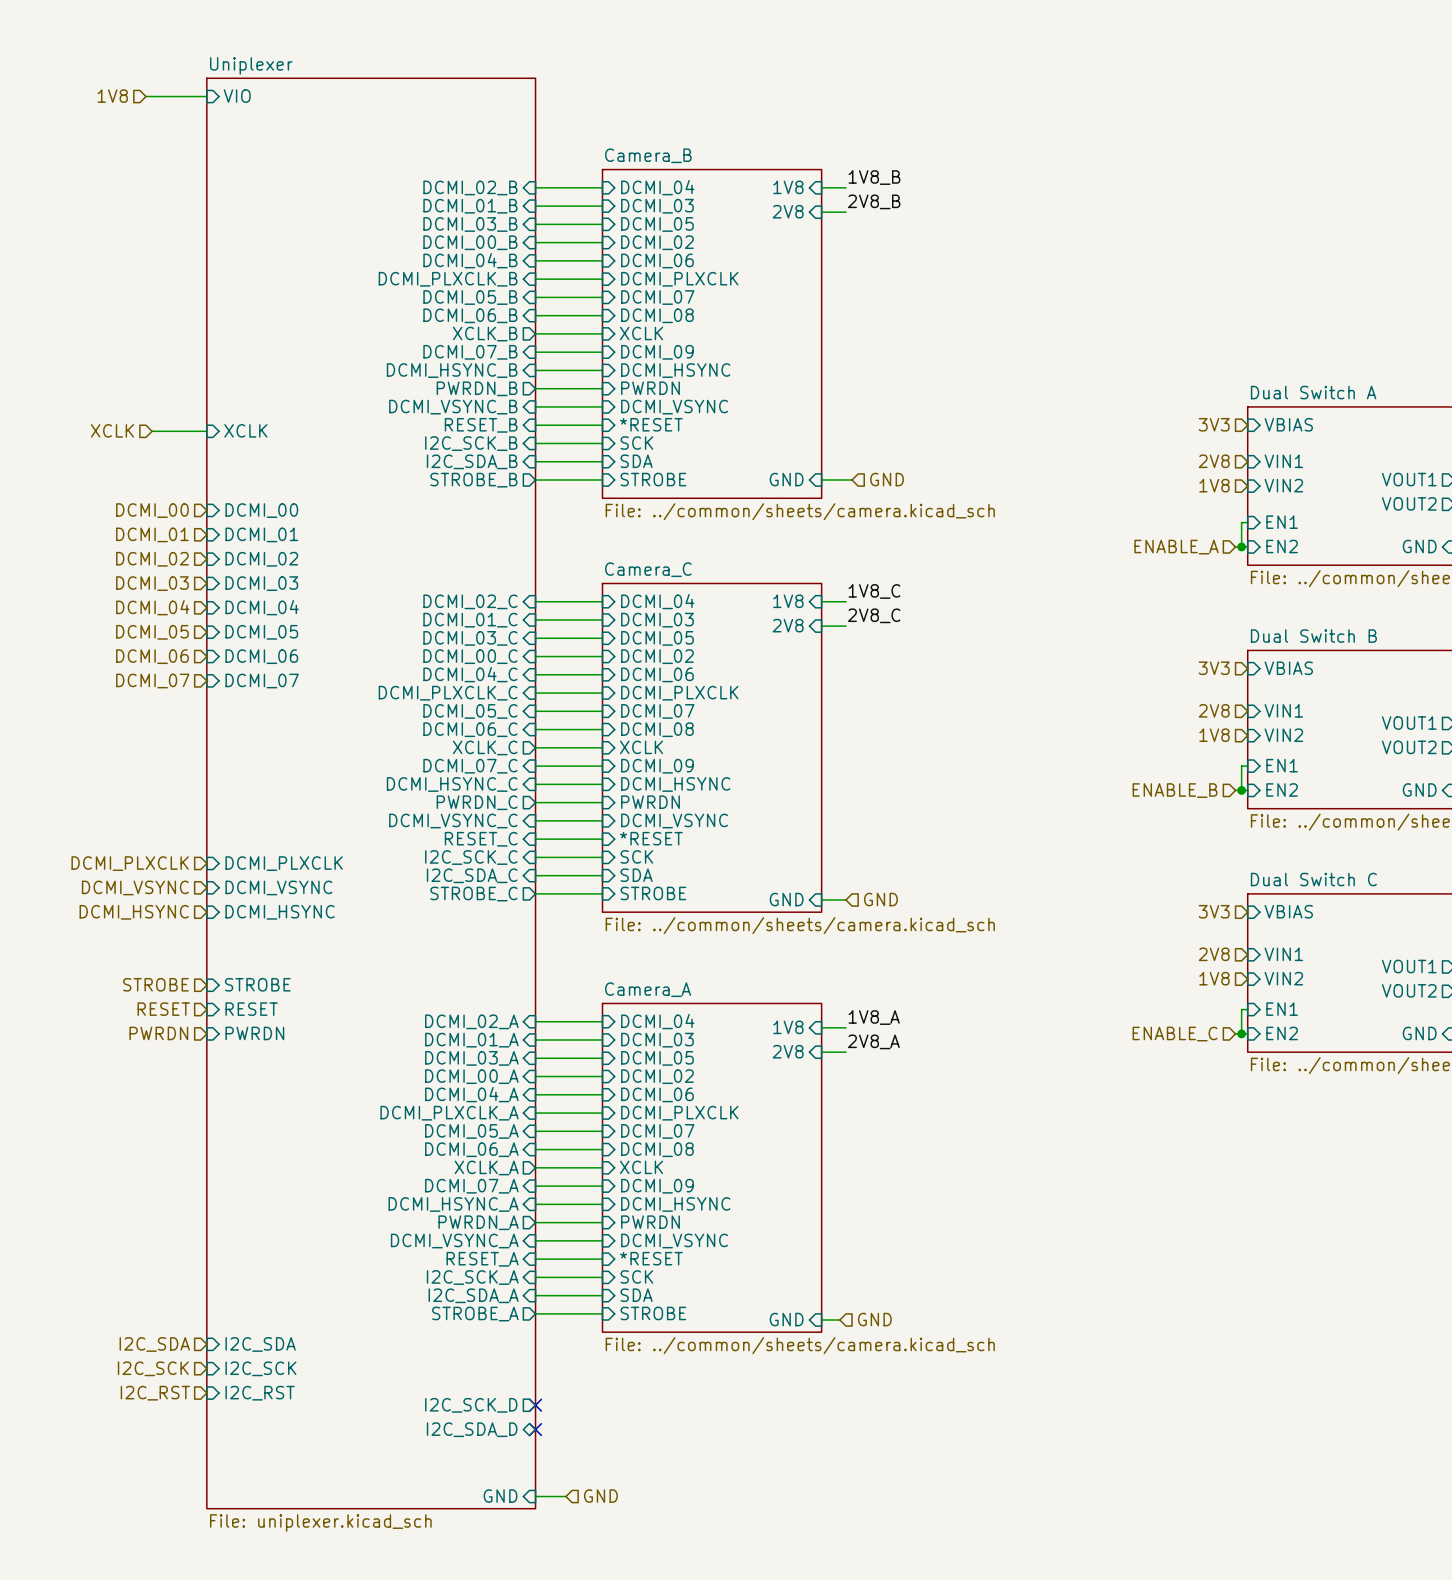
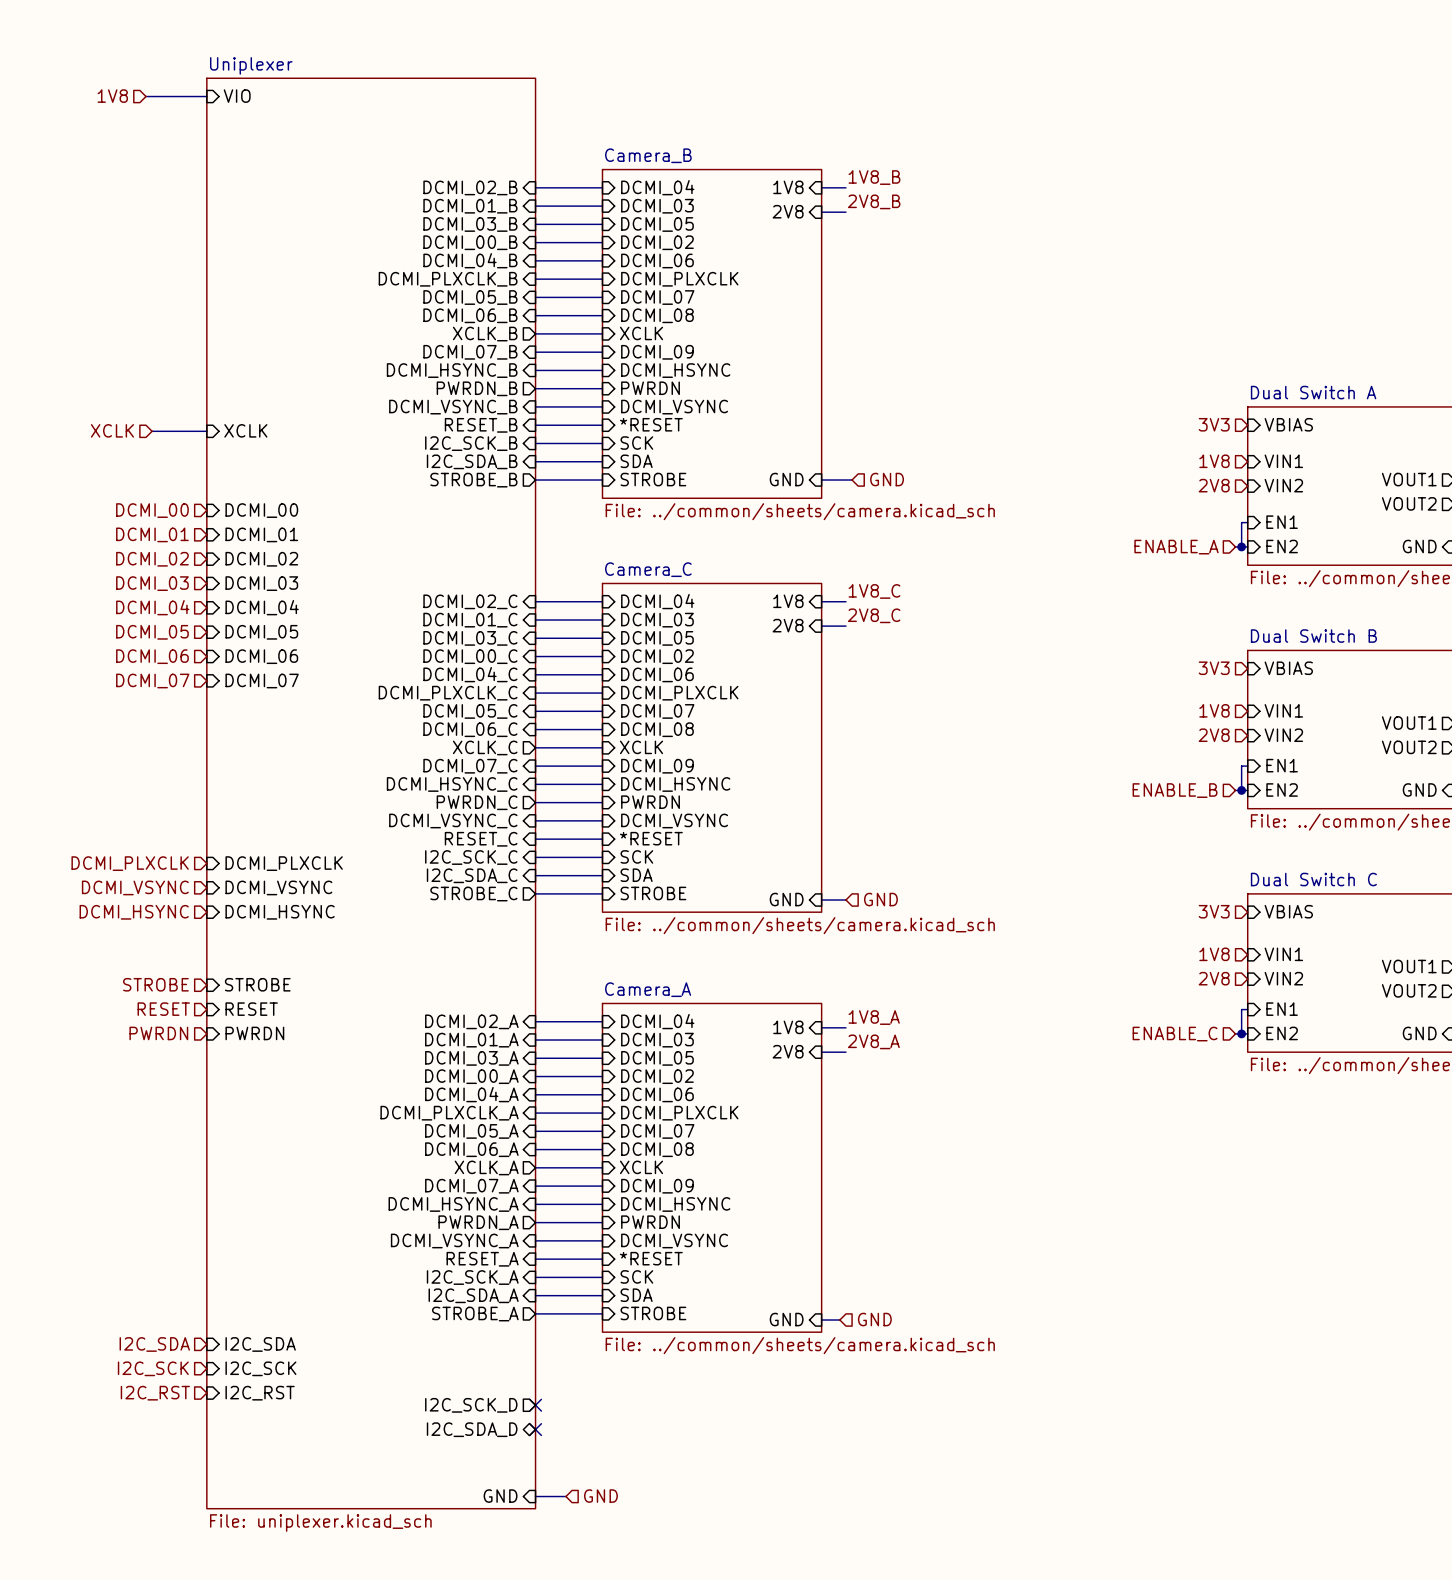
hierarchical label: 2V8 (1214, 461) -> 1V8 (1214, 461)
hierarchical label: 1V8 (1214, 485) -> 2V8 (1214, 485)
hierarchical label: 2V8 (1214, 710) -> 1V8 (1214, 710)
hierarchical label: 1V8 (1214, 735) -> 2V8 (1214, 735)
hierarchical label: 2V8 (1214, 954) -> 1V8 (1214, 954)
hierarchical label: 1V8 (1214, 978) -> 2V8 (1214, 978)

